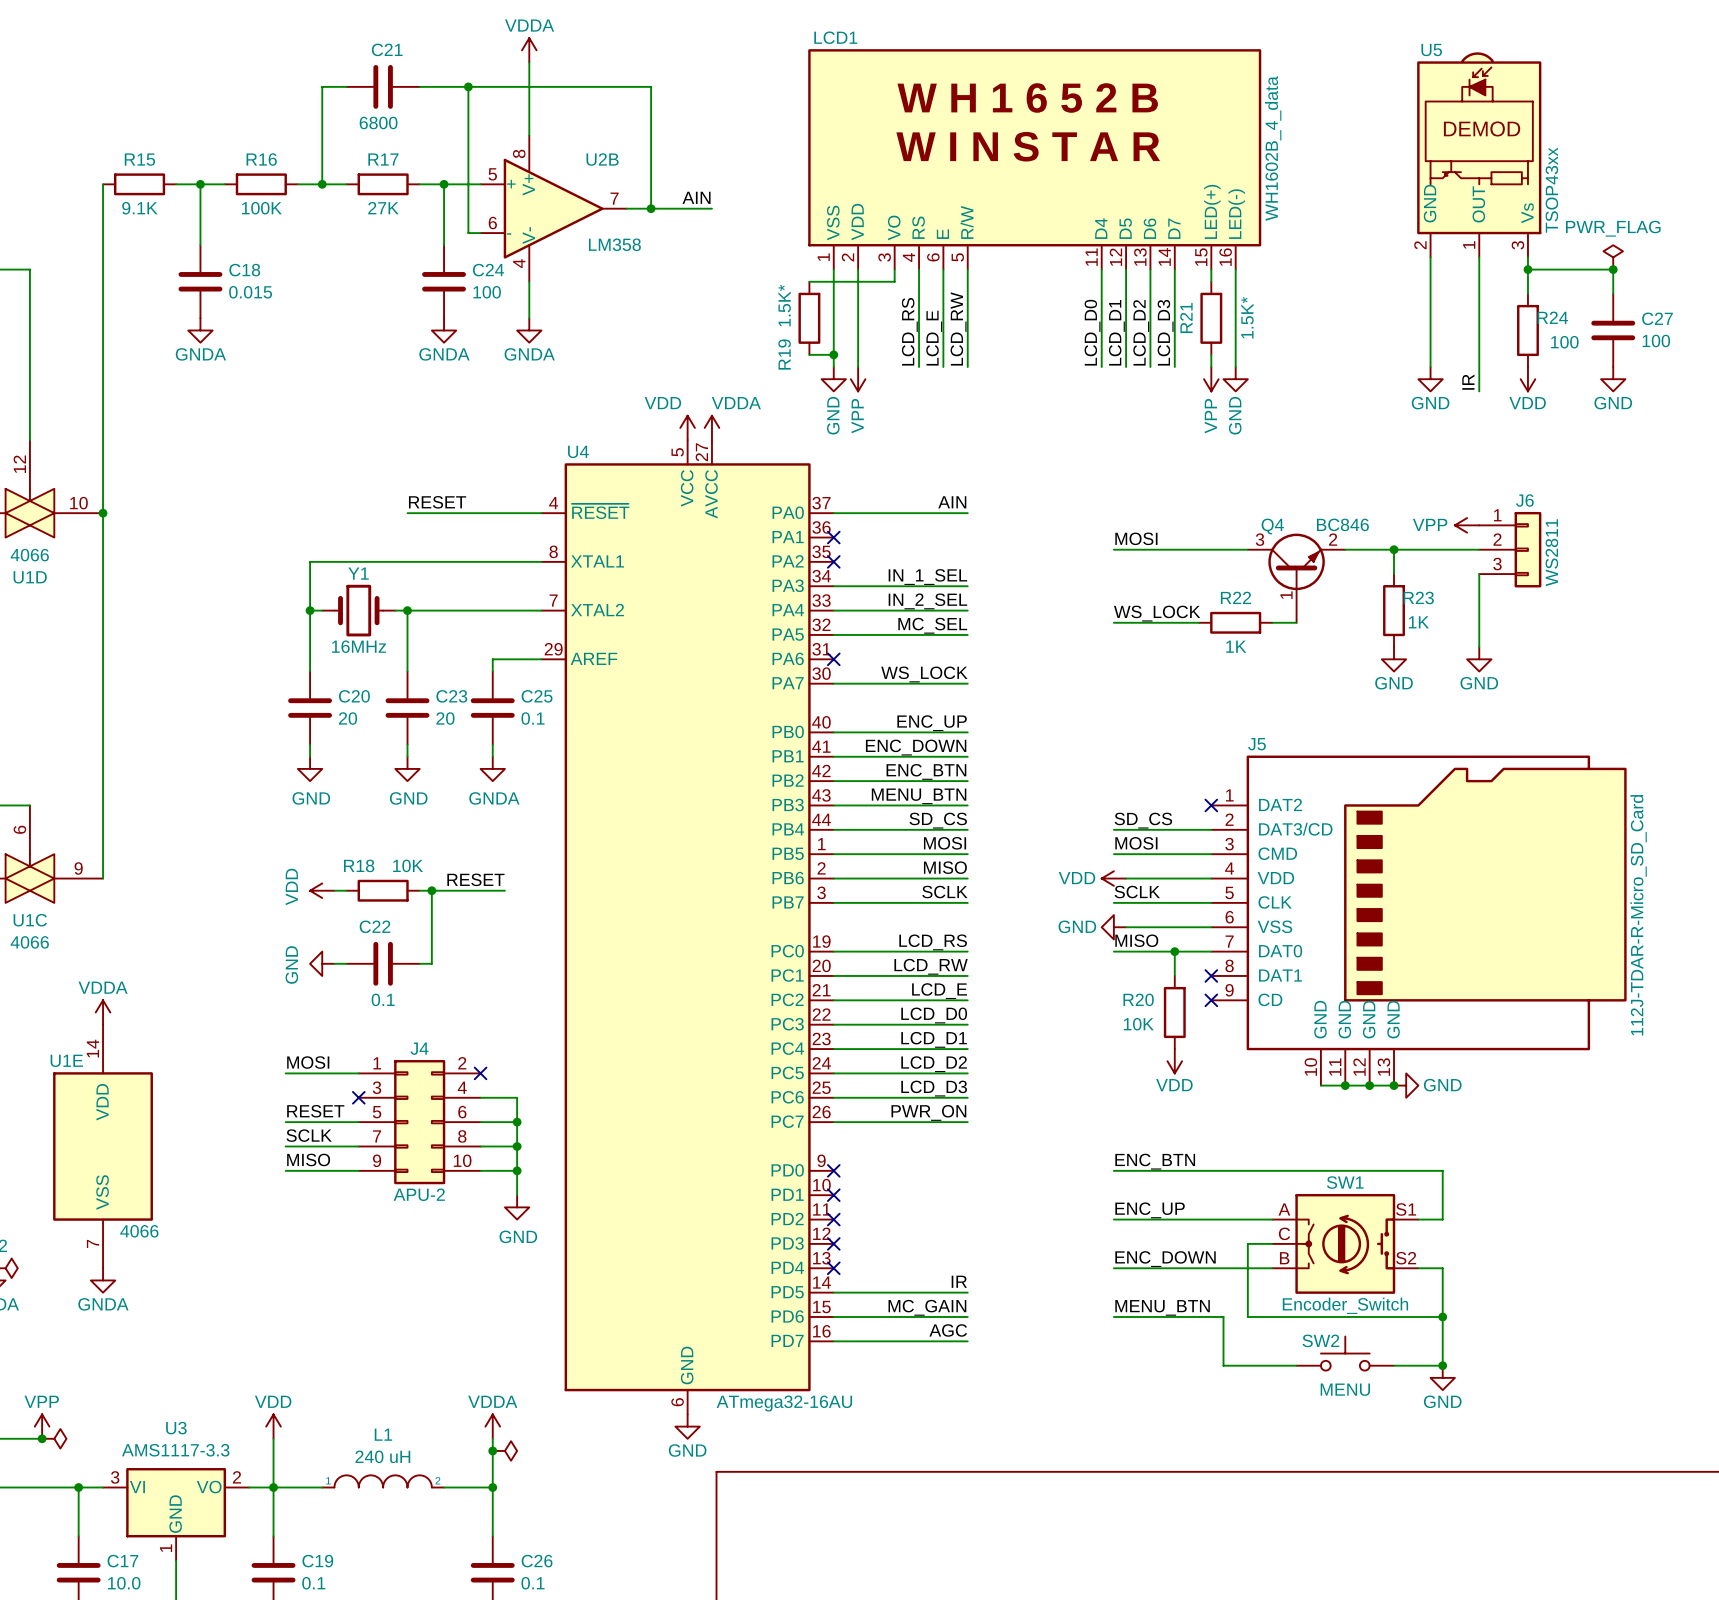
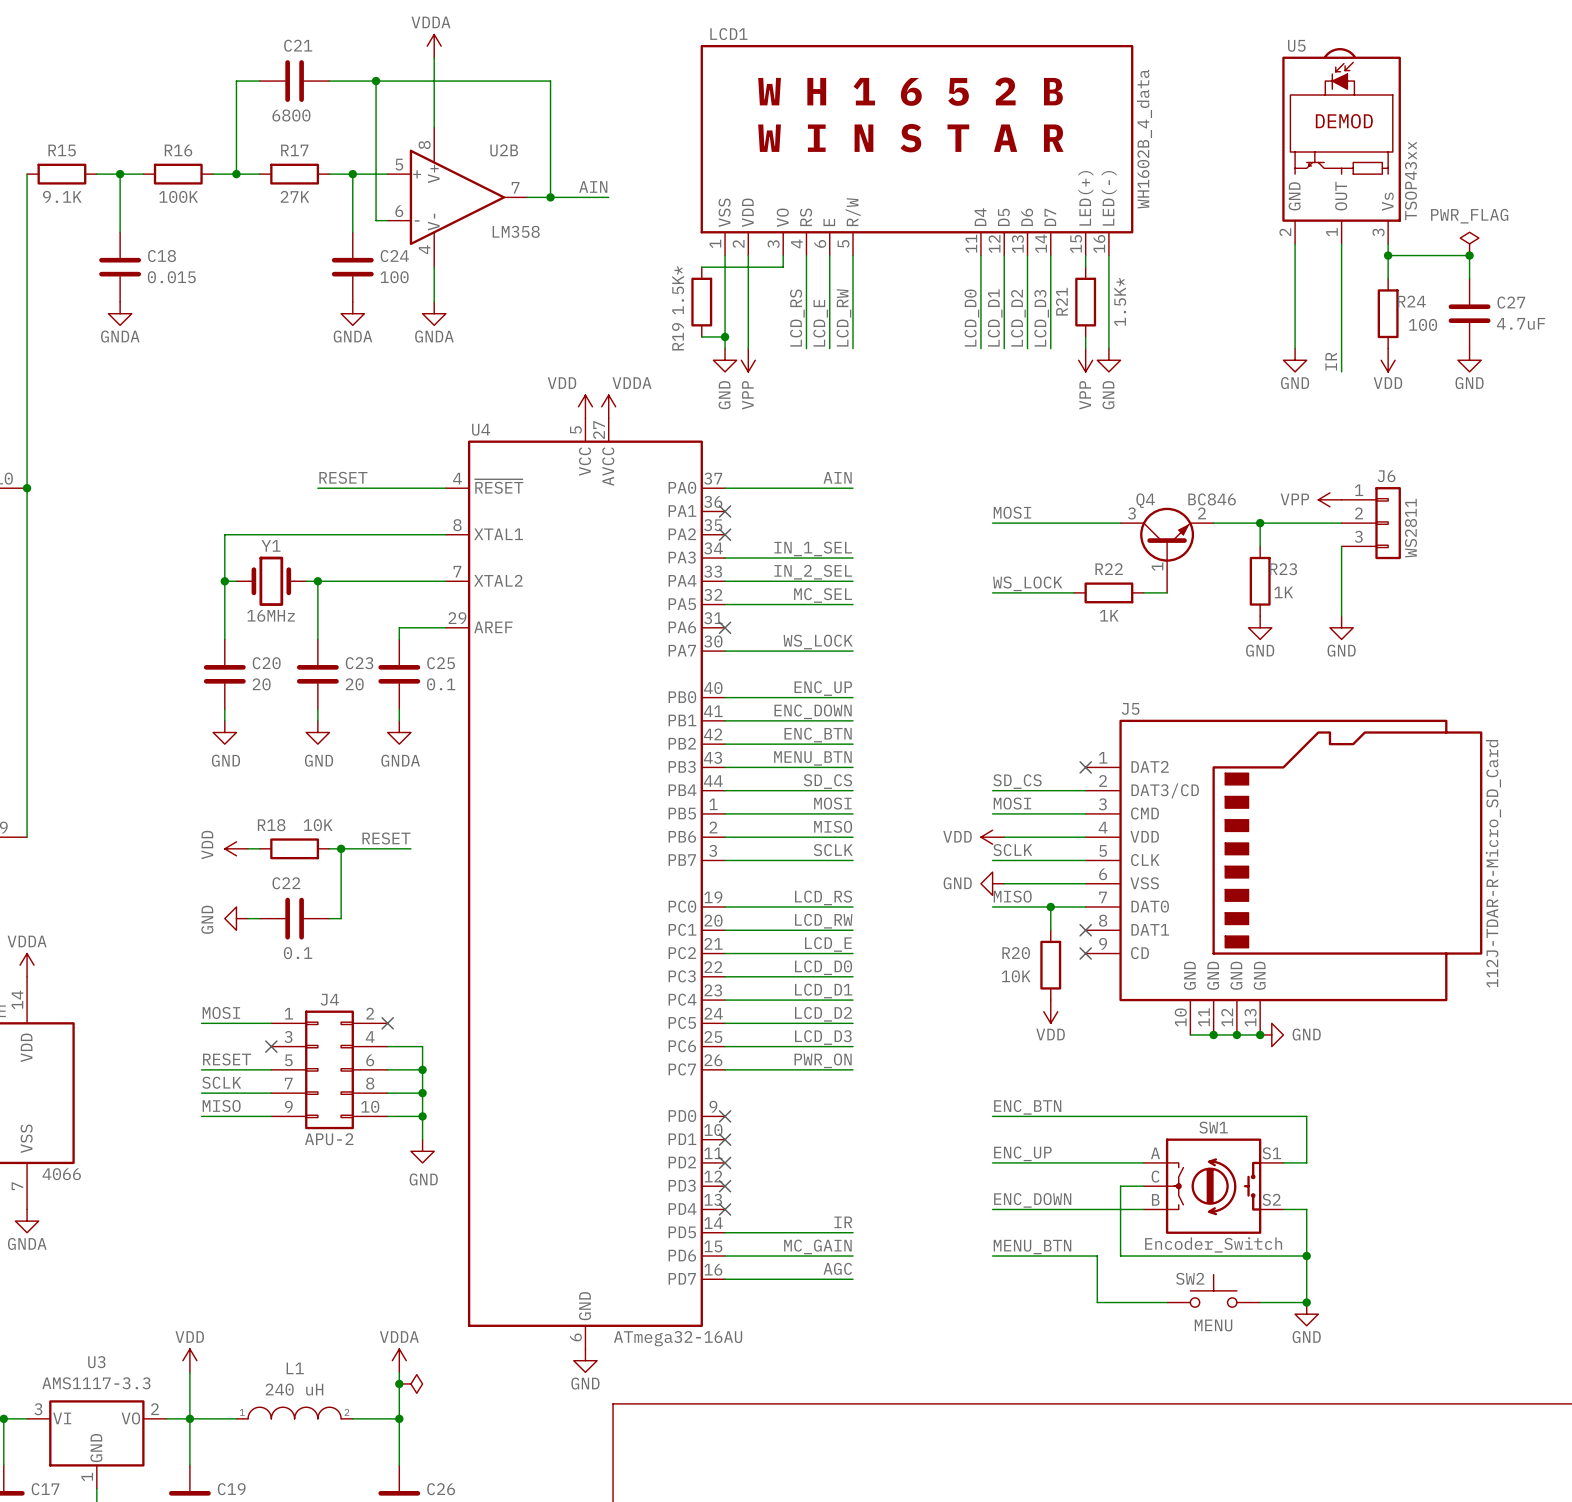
C27 value: 100 (1656, 340) -> 4.7uF (1521, 323)

